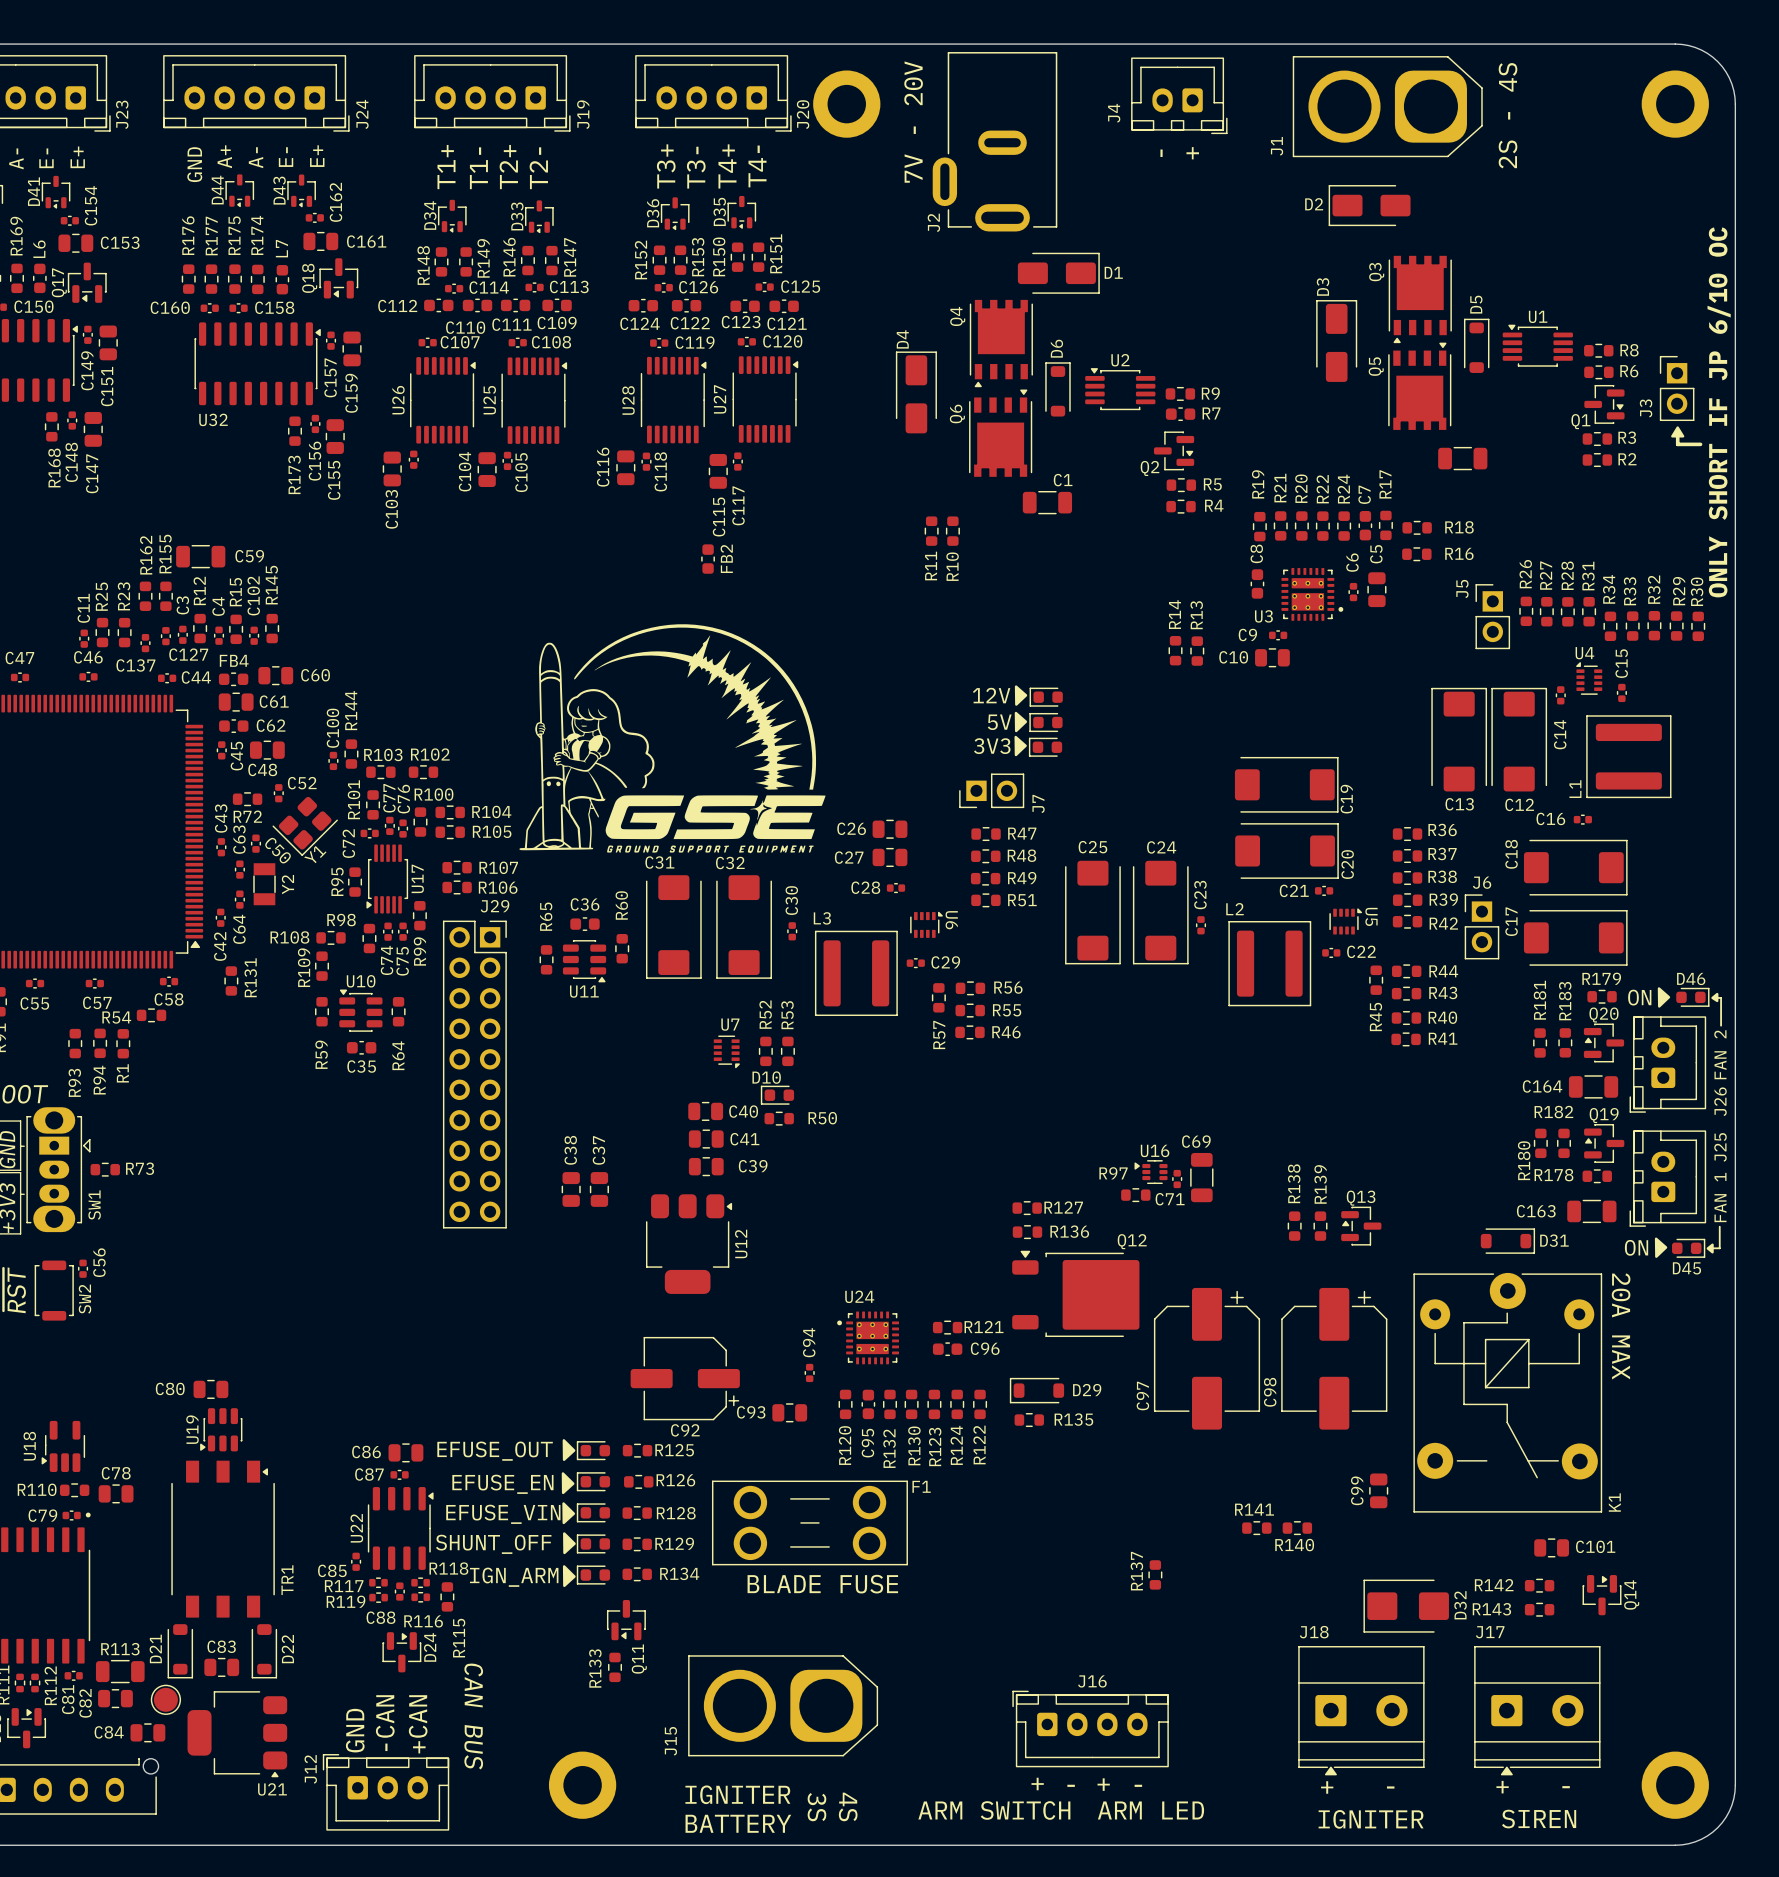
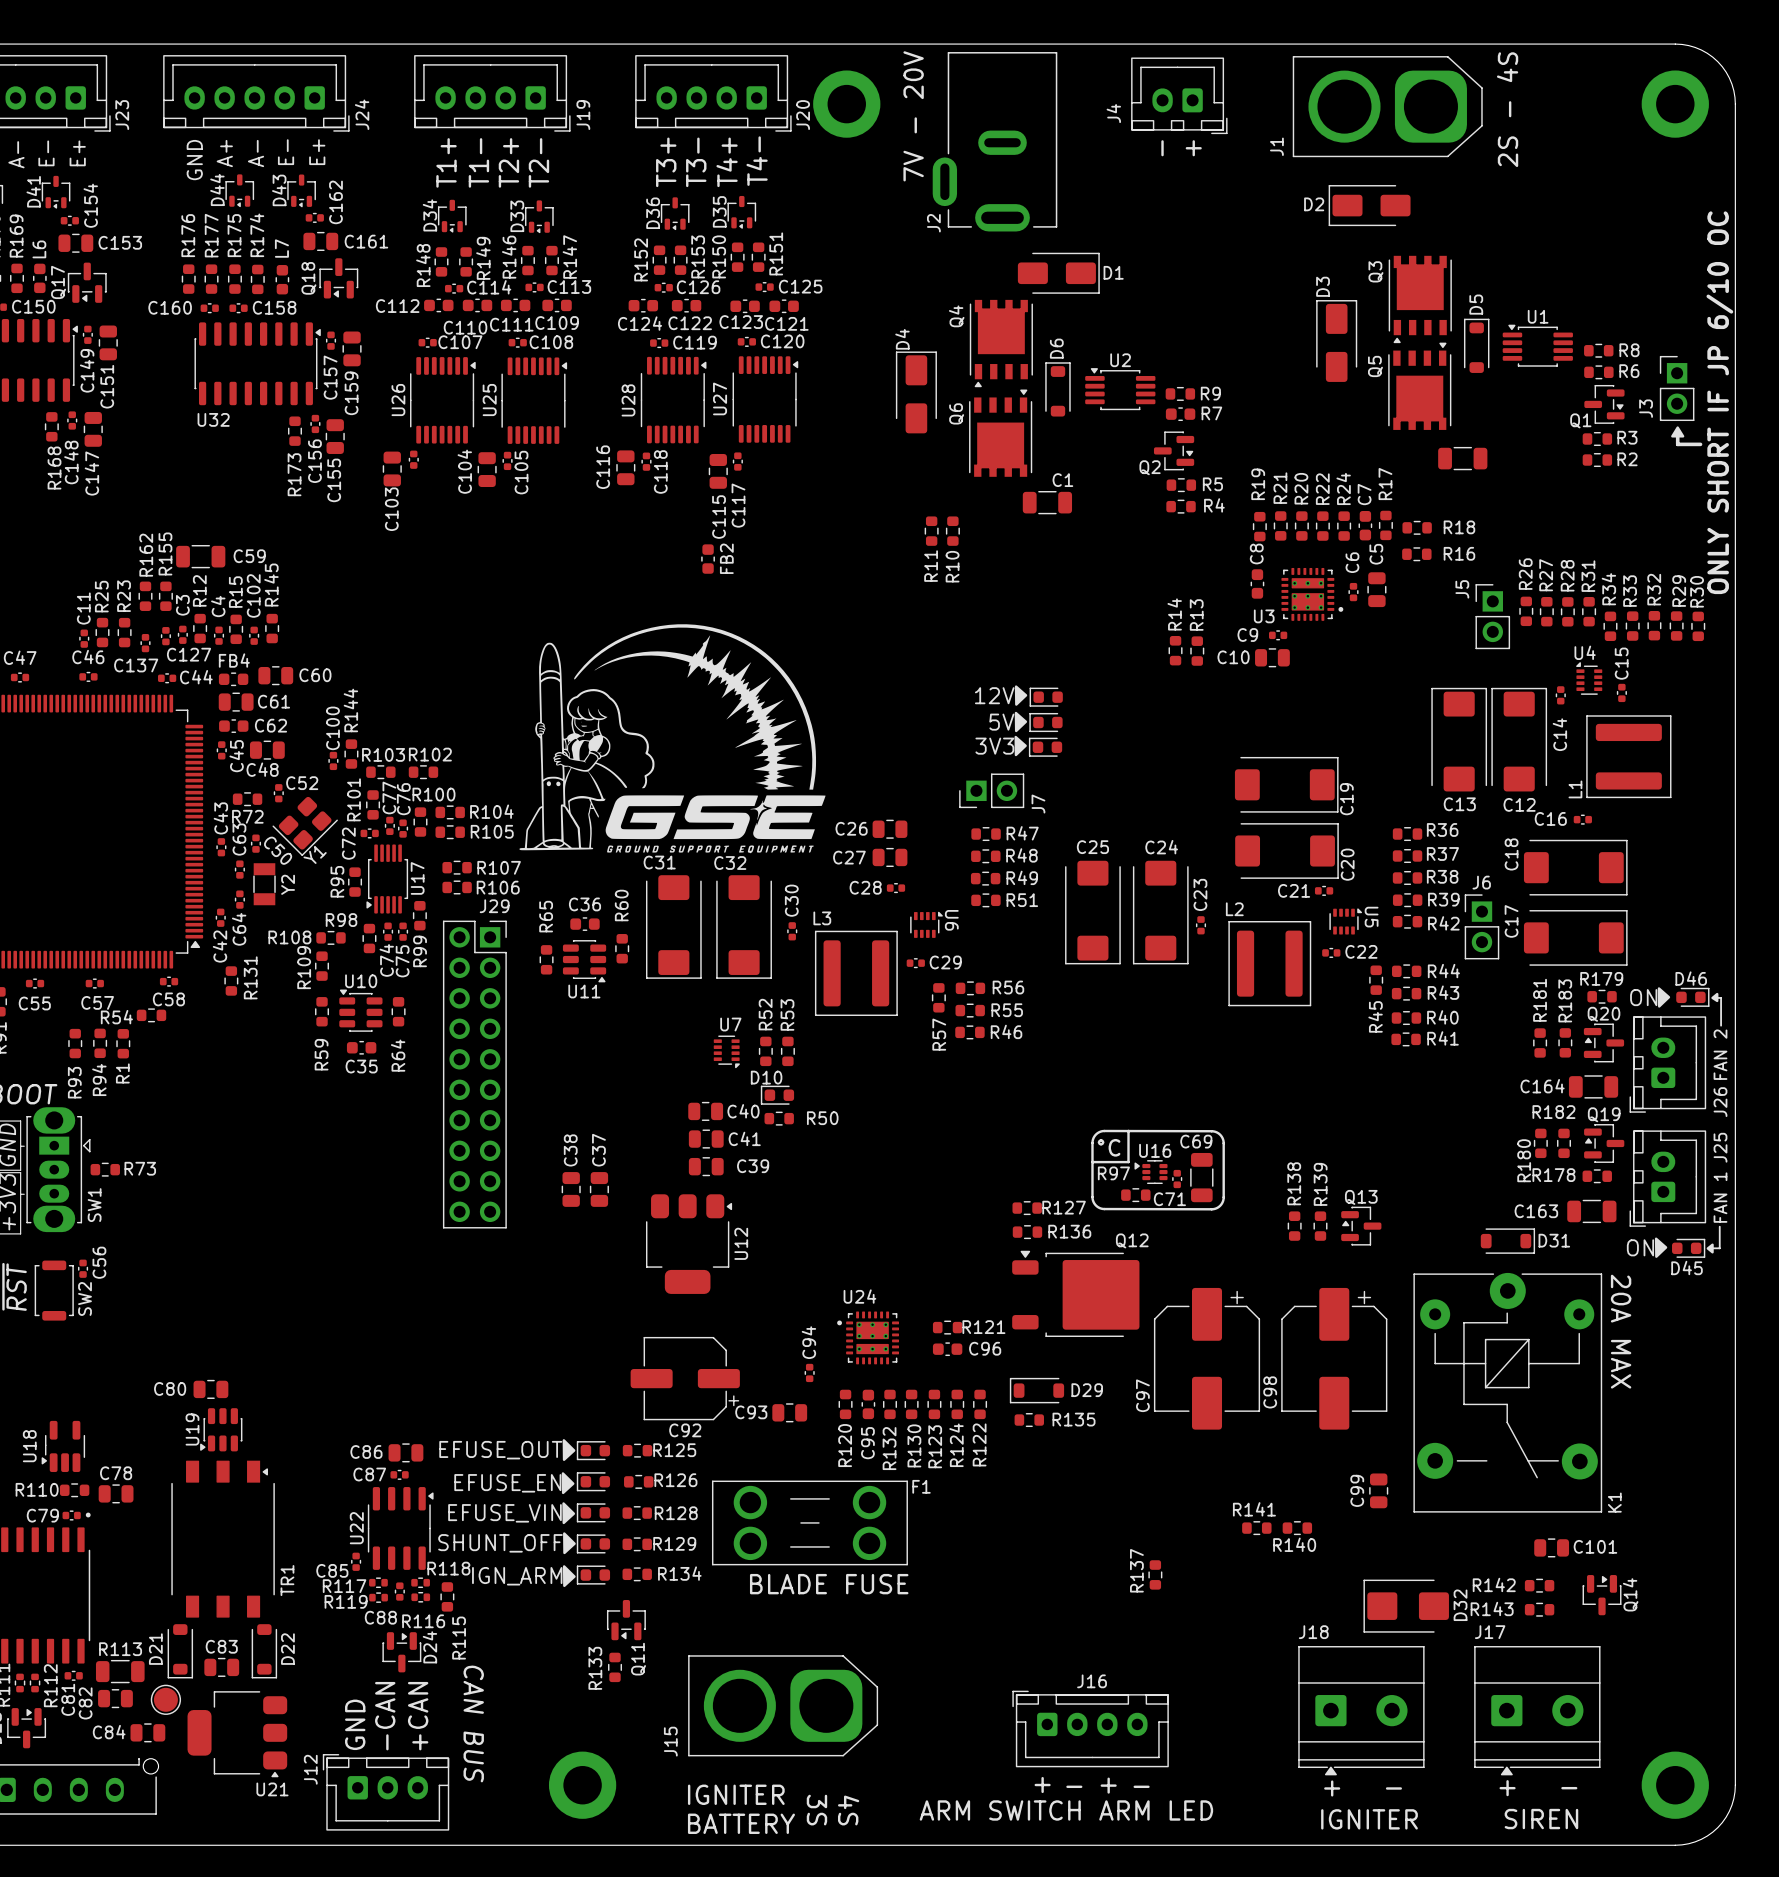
line: none -> (1104, 1130) (1211, 1131) (1218, 1133) (1223, 1143) (1223, 1197) (1221, 1203) (1211, 1209) (1104, 1209) (1098, 1207) (1092, 1198) (1092, 1141) (1095, 1134) (1104, 1130)
line: none -> (1128, 1130) (1128, 1162) (1092, 1162)
text: none -> °C (1109, 1147)

